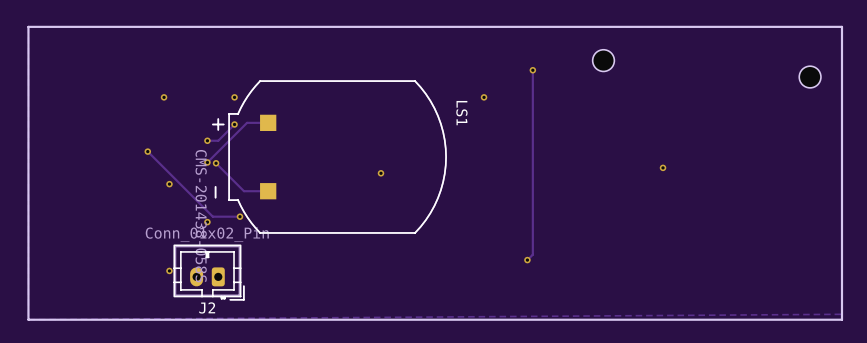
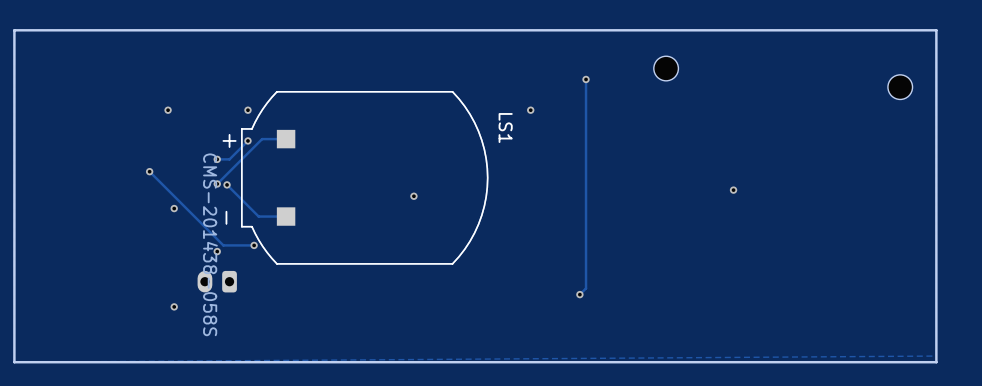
J2 side: bottom (209, 272) -> top (217, 281)

